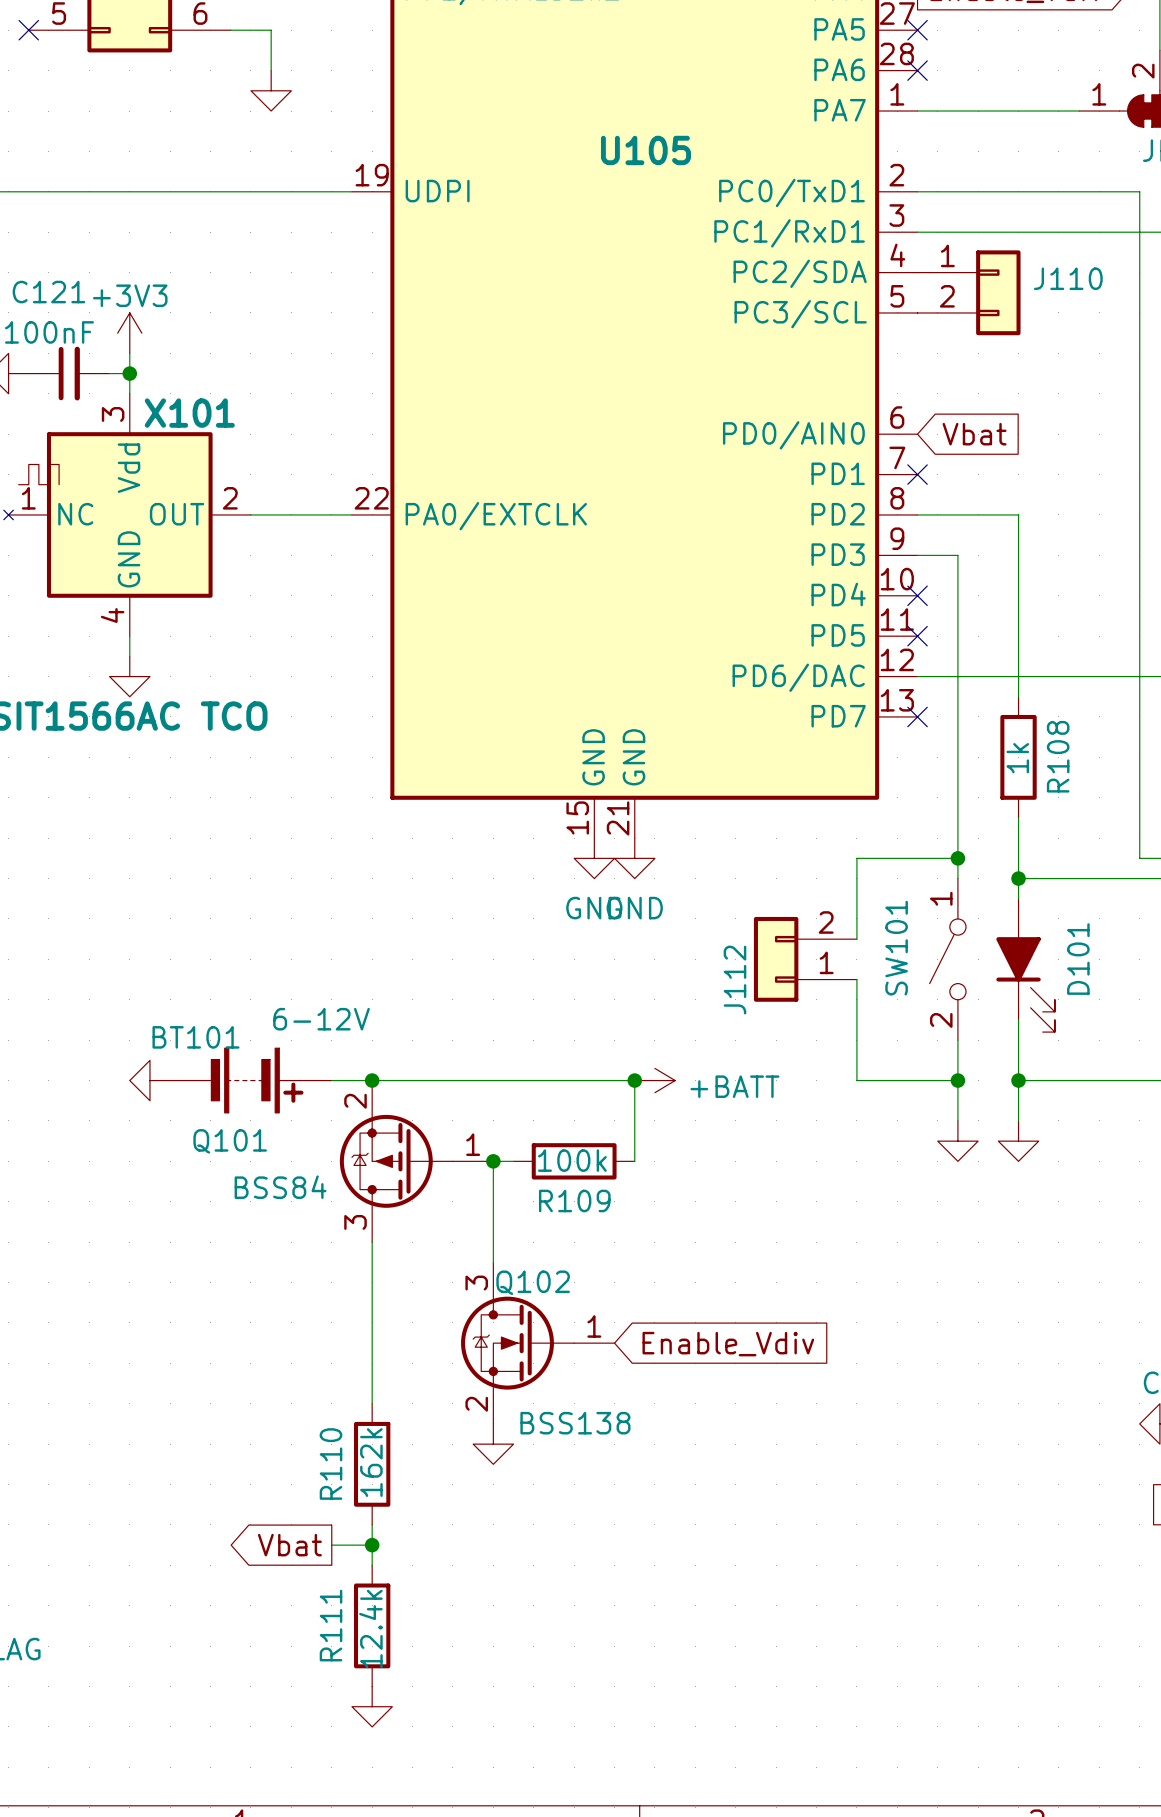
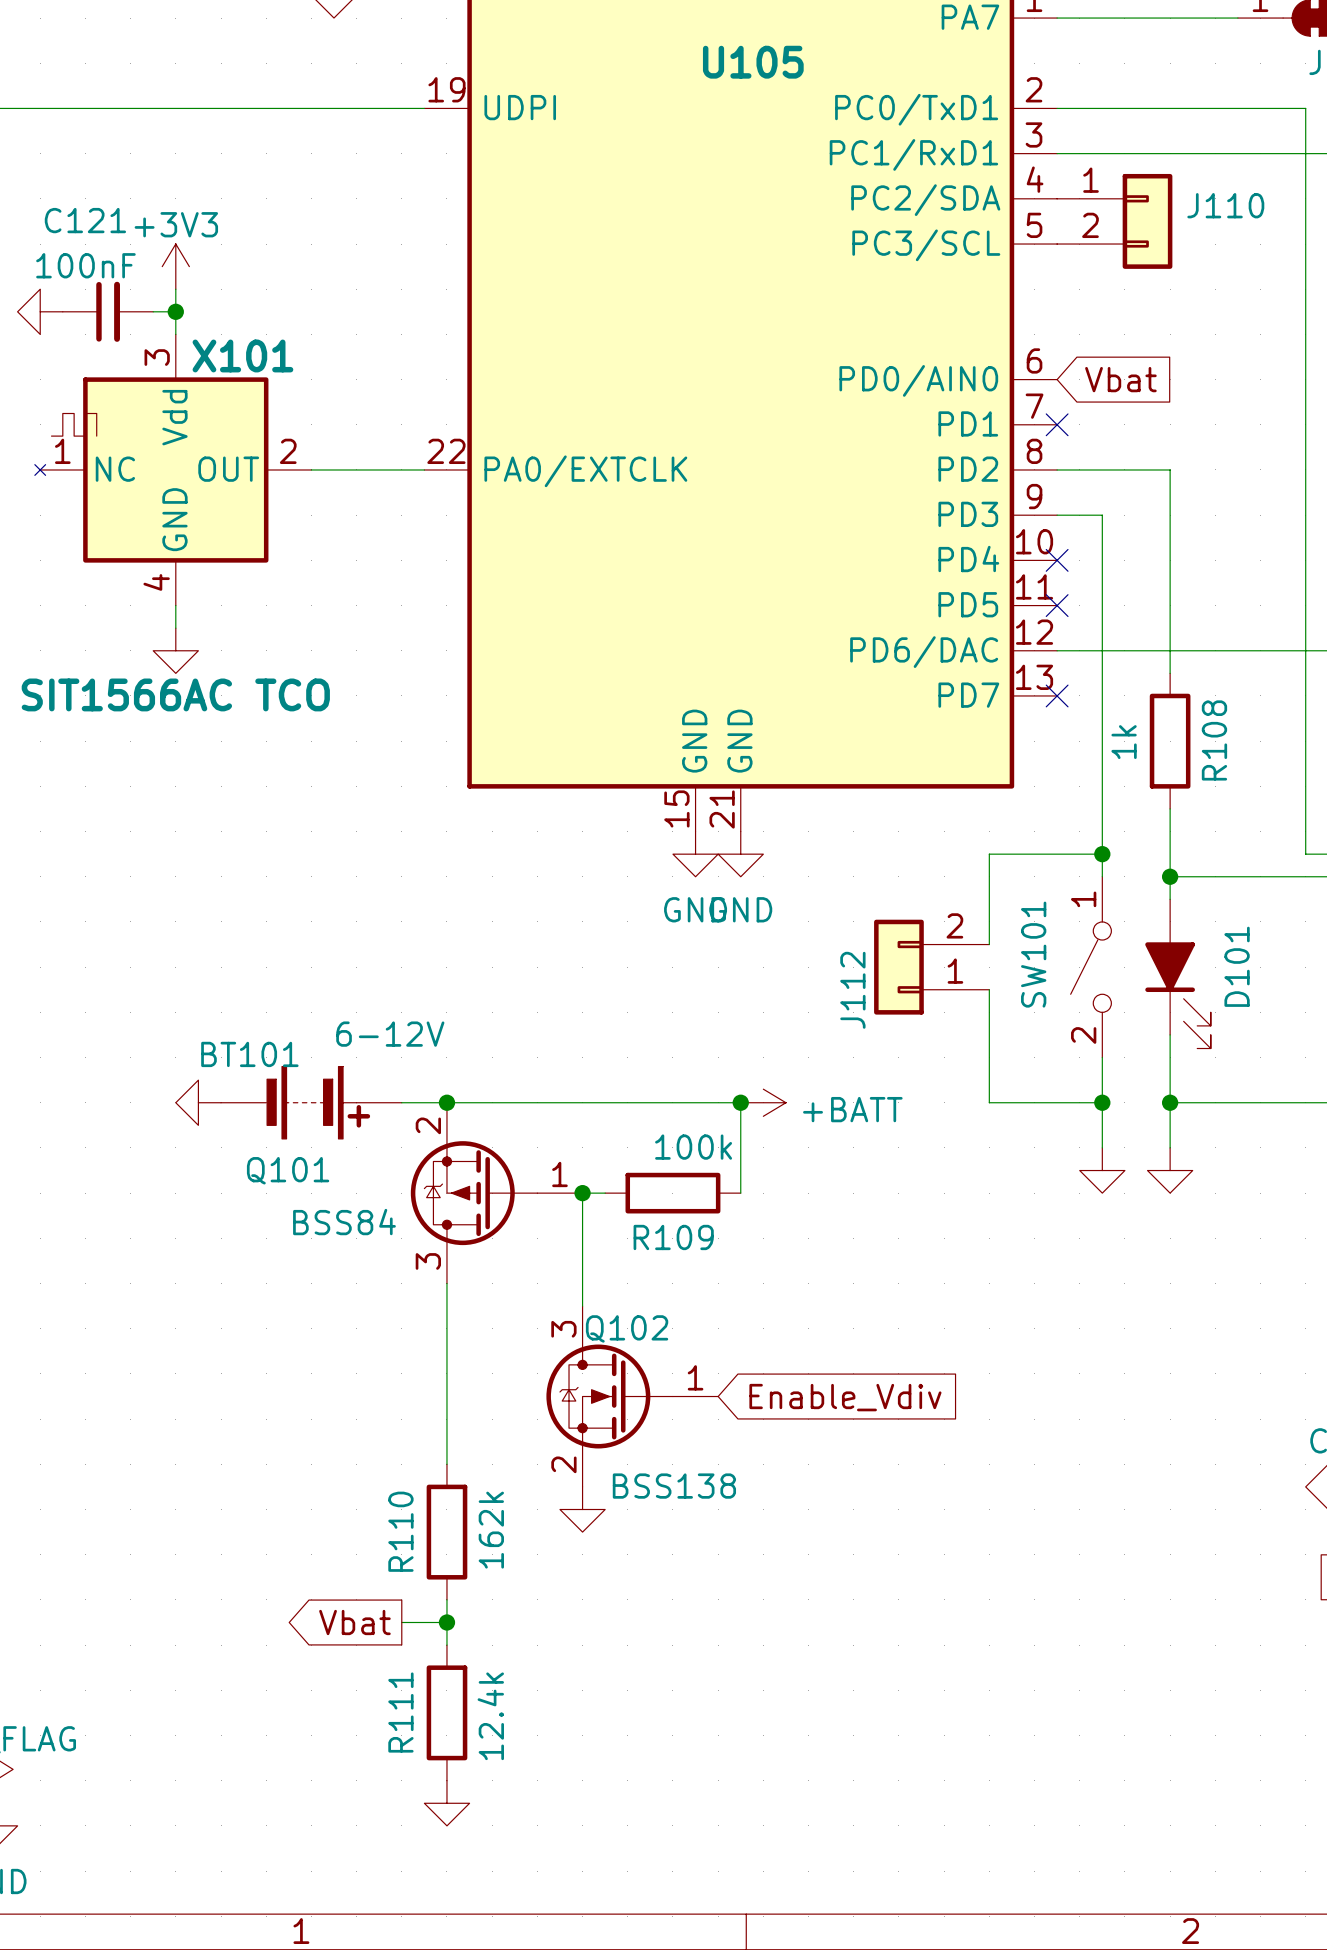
R108 value position: 1k (1017, 758) -> 1k (1124, 742)
R109 value position: 100k (572, 1160) -> 100k (693, 1147)
R110 value position: 162k (371, 1462) -> 162k (491, 1530)
R111 value position: 12.4k (370, 1628) -> 12.4k (490, 1716)

